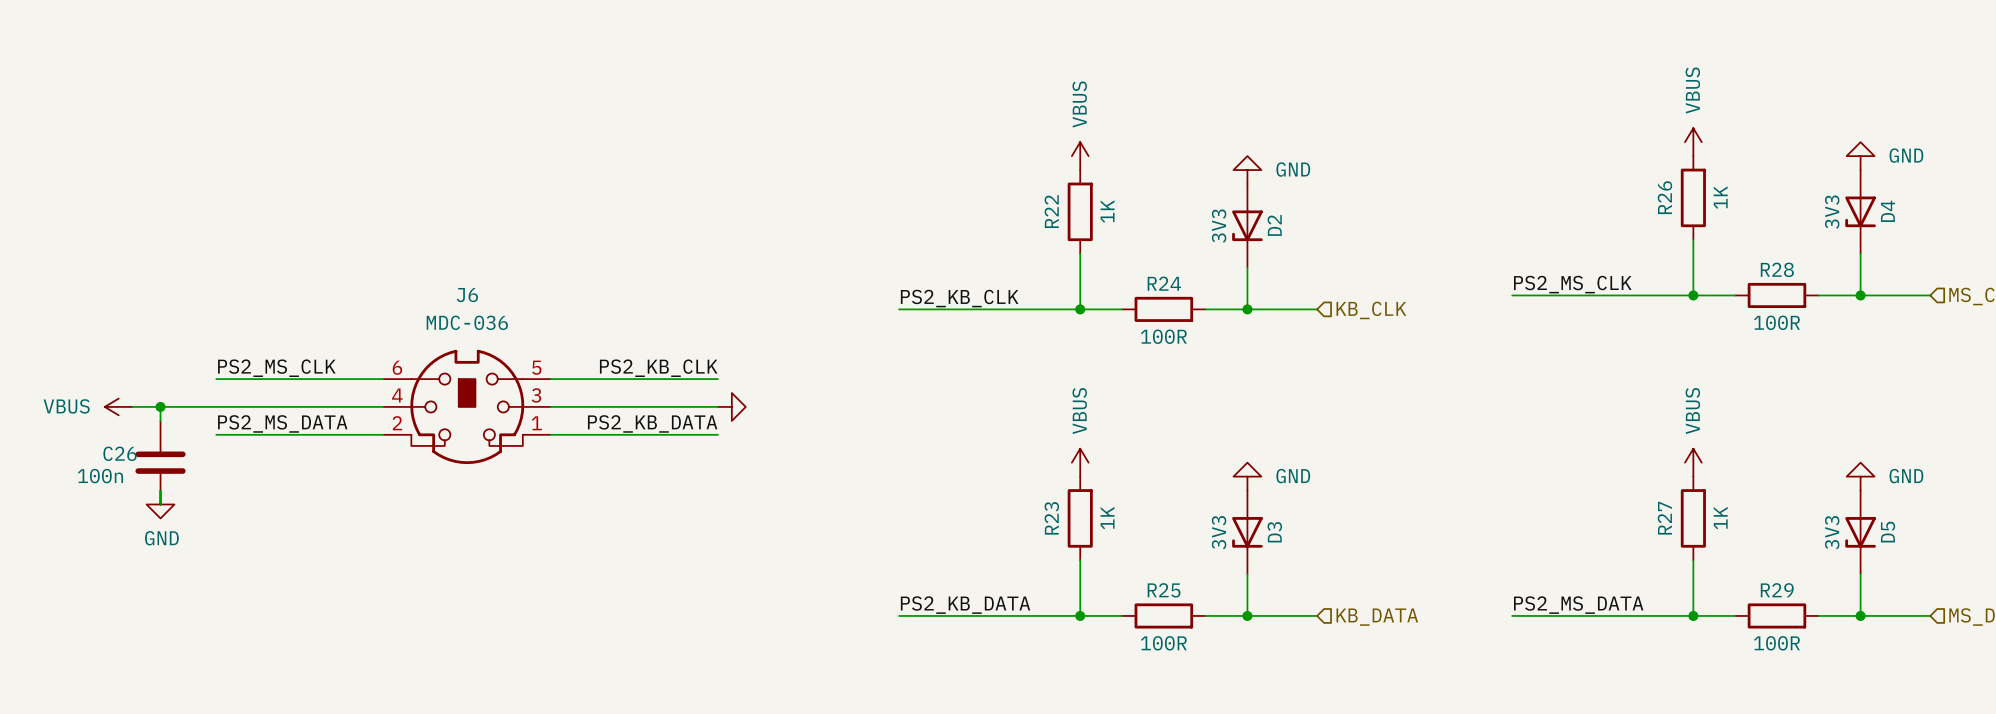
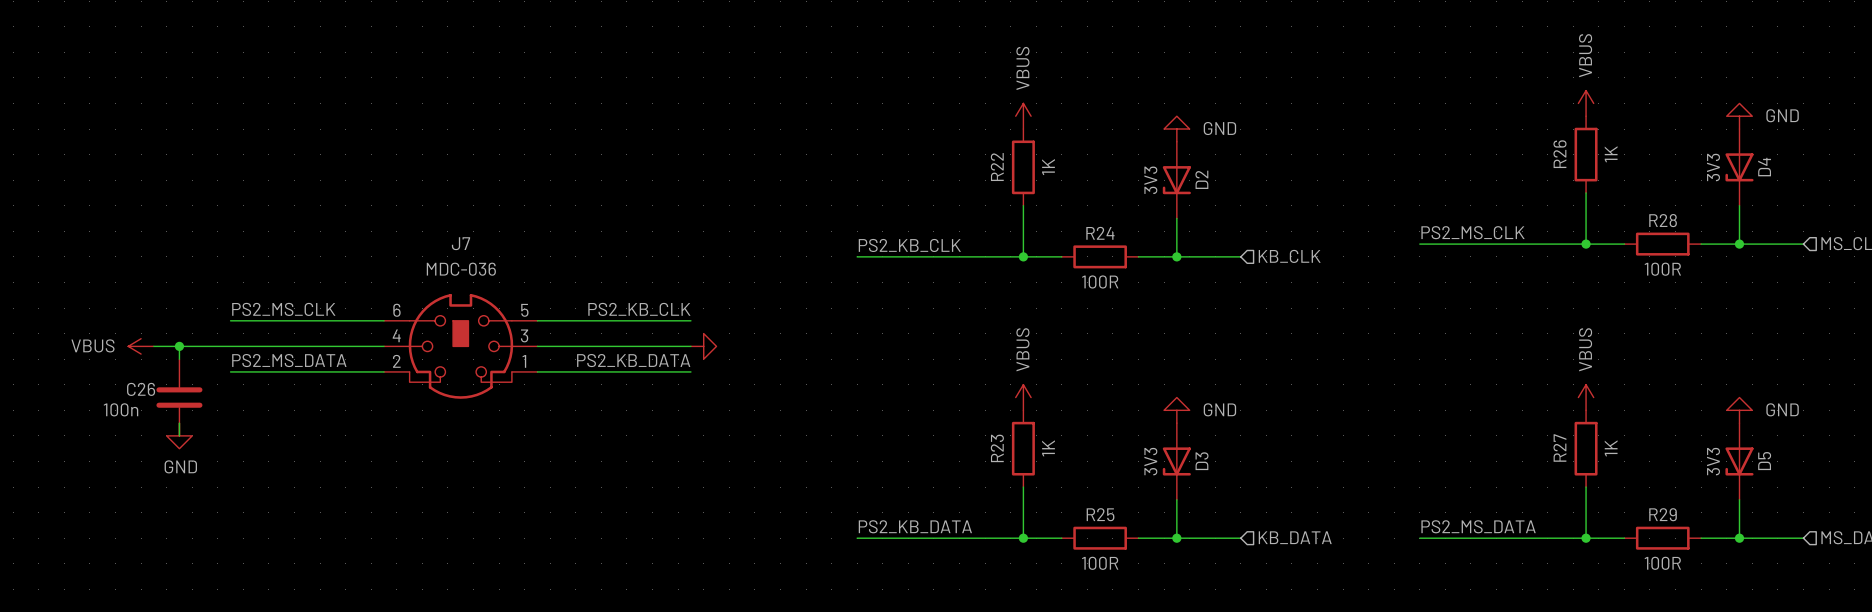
J6 name: J6 (467, 295) -> J7 (461, 243)

